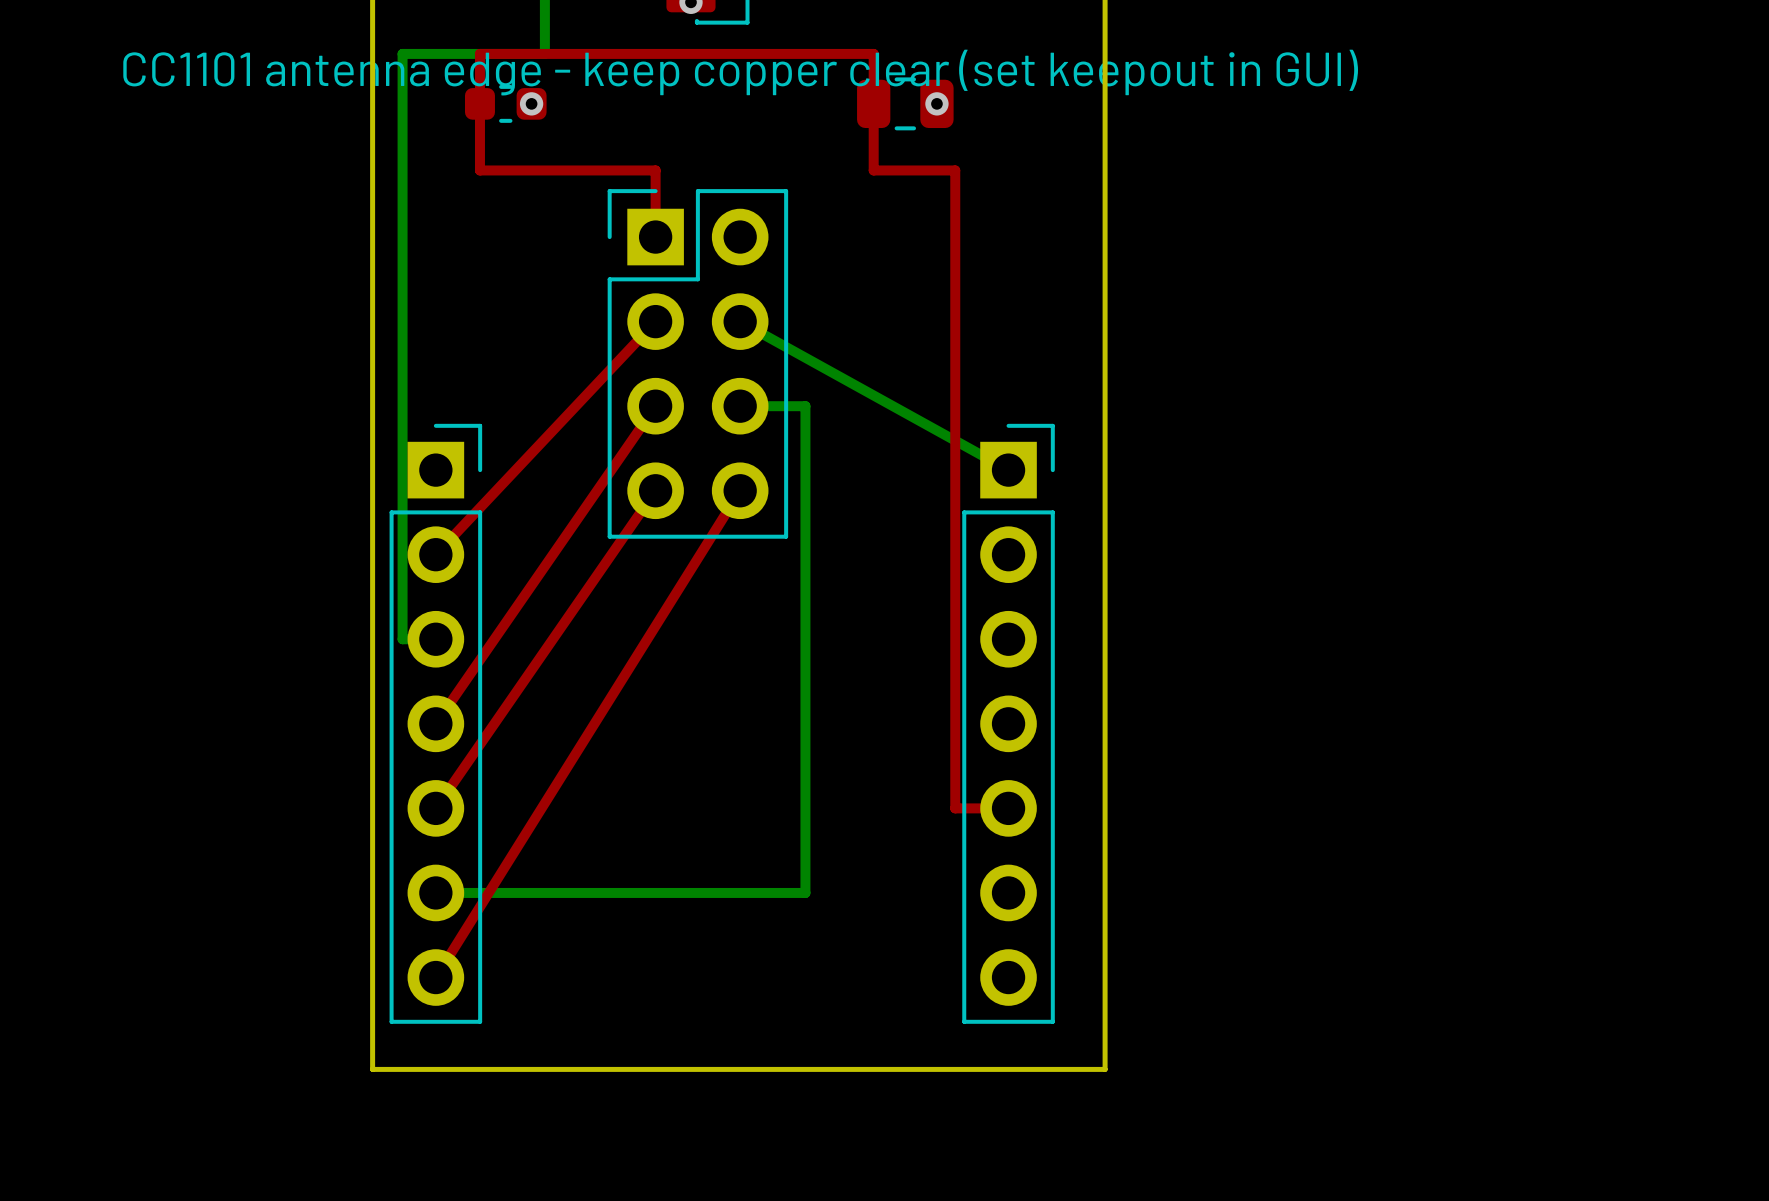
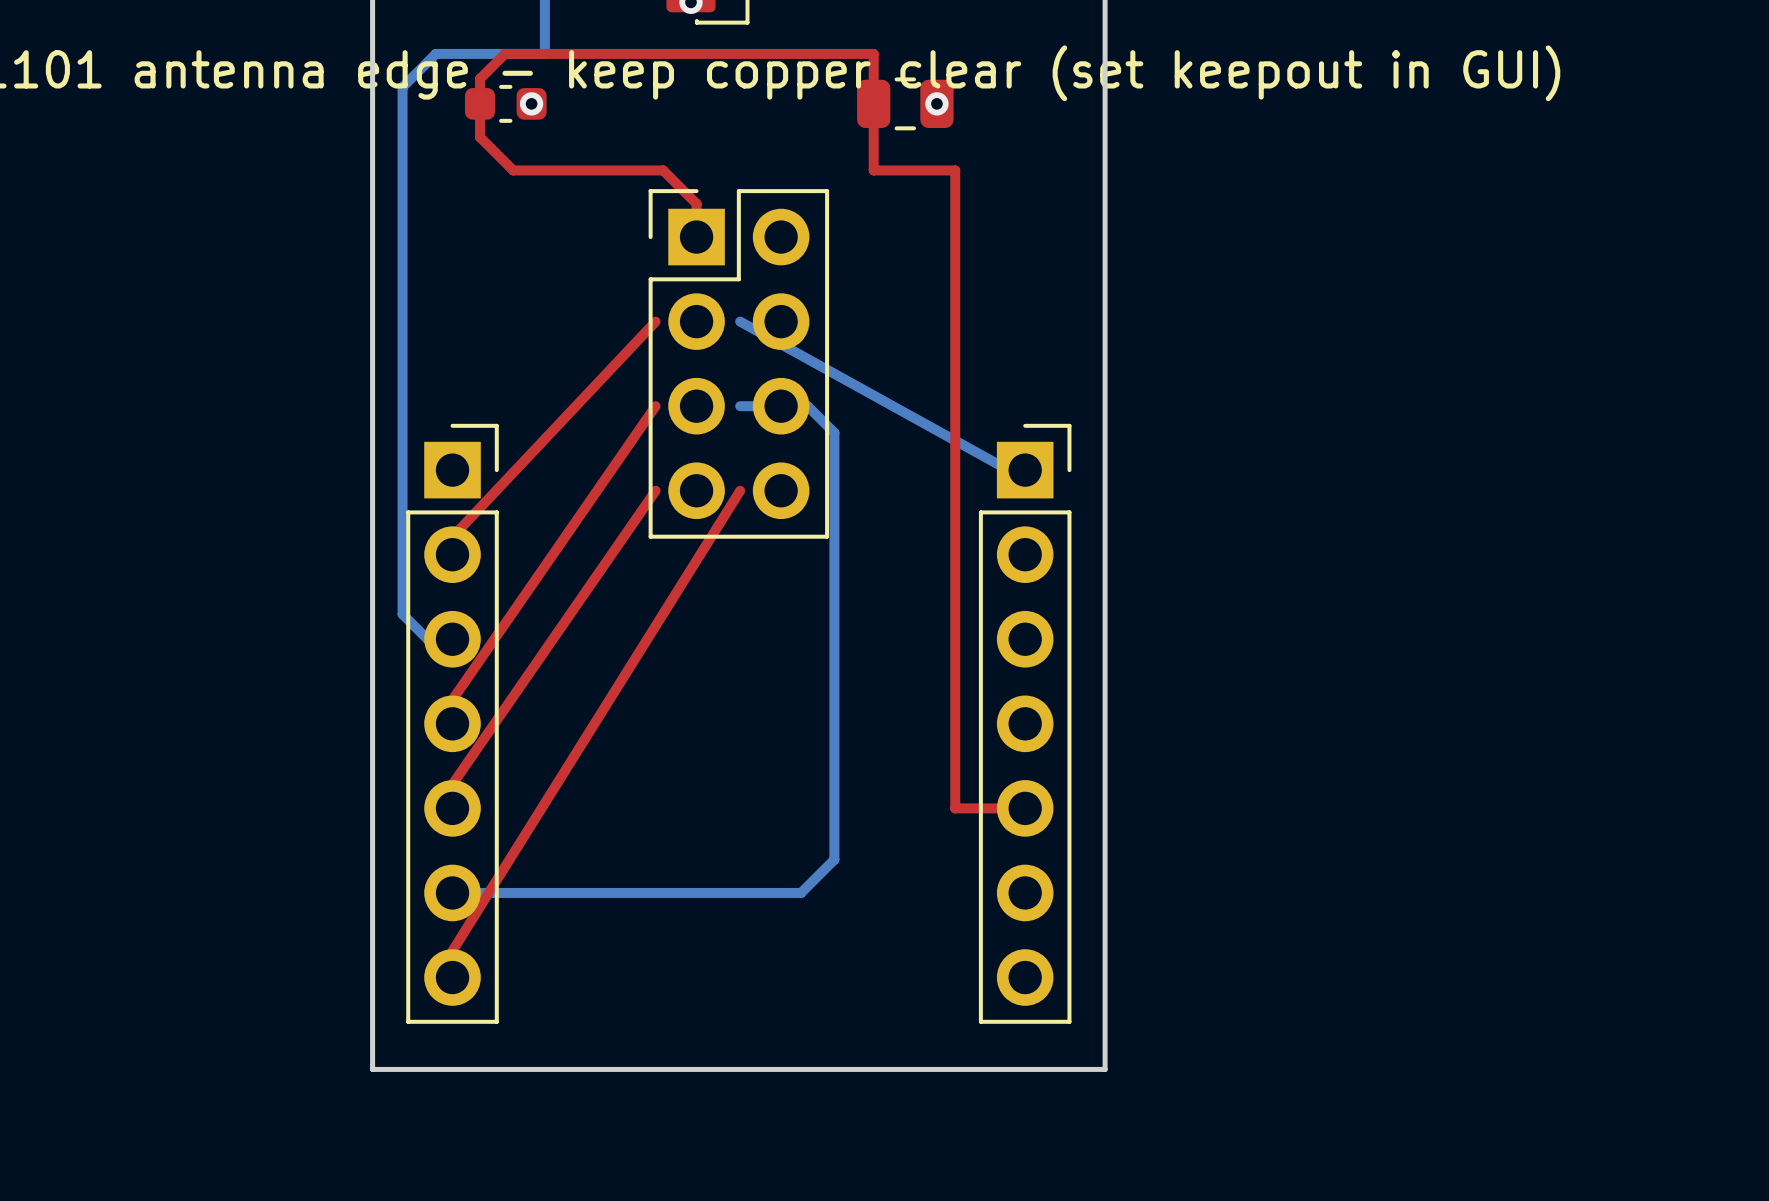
bottom track: (435, 53) (402, 53) (402, 87) -> (435, 53) (402, 87)
top track: (504, 53) (479, 53) (479, 78) -> (504, 53) (479, 78)
top track: (479, 137) (479, 170) (513, 170) -> (479, 137) (513, 170)
top track: (655, 170) (655, 237) -> (655, 170) (663, 170) (696, 203) (696, 237)
part position: (697, 363) -> (738, 363)
bottom track: (805, 406) (805, 892) (801, 892) -> (805, 406) (807, 406) (834, 432) (834, 859) (801, 892)
bottom track: (402, 614) (402, 639) (427, 639) -> (402, 614) (427, 639)
part position: (435, 723) -> (452, 723)
part position: (1008, 723) -> (1025, 723)

